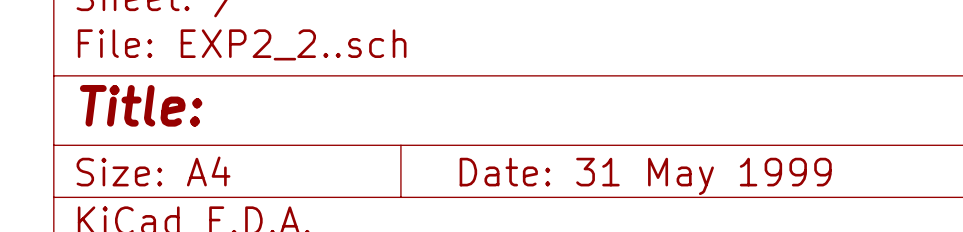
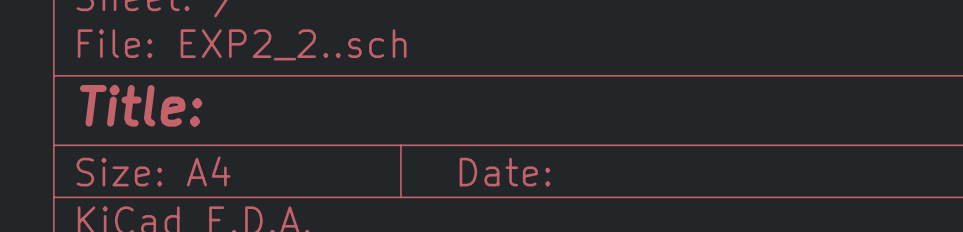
title block: Date: 31 May 1999 (645, 176) -> Date: (504, 172)

